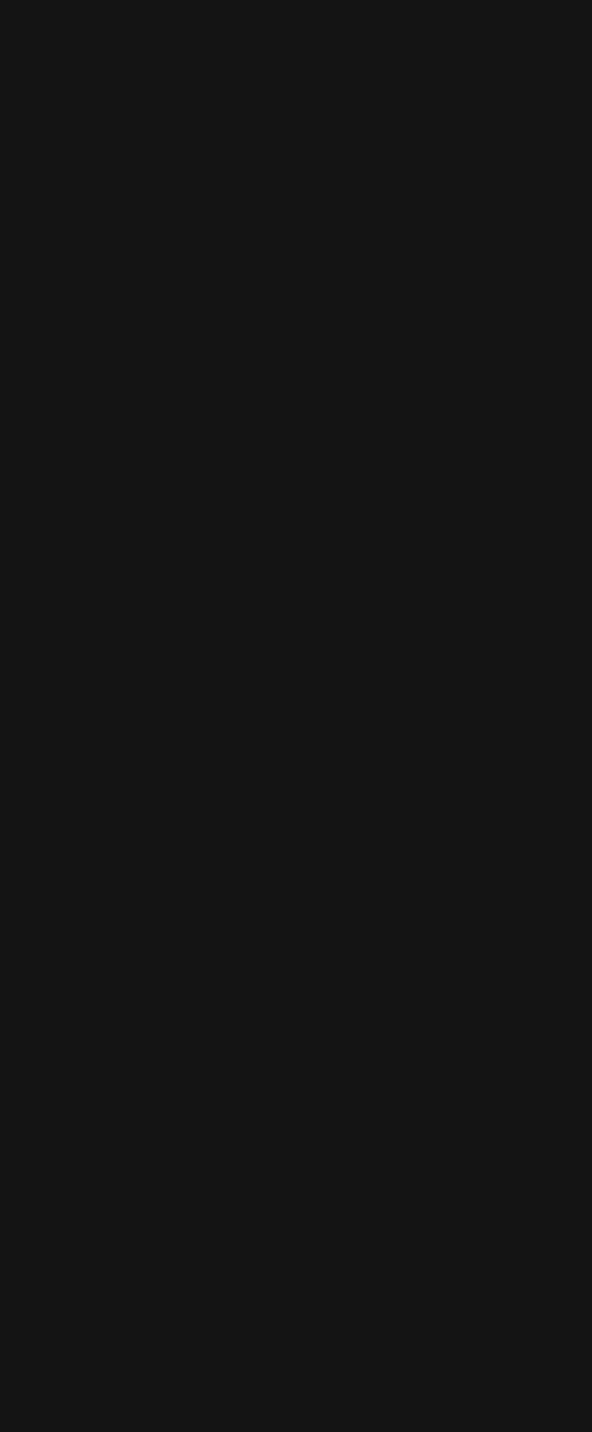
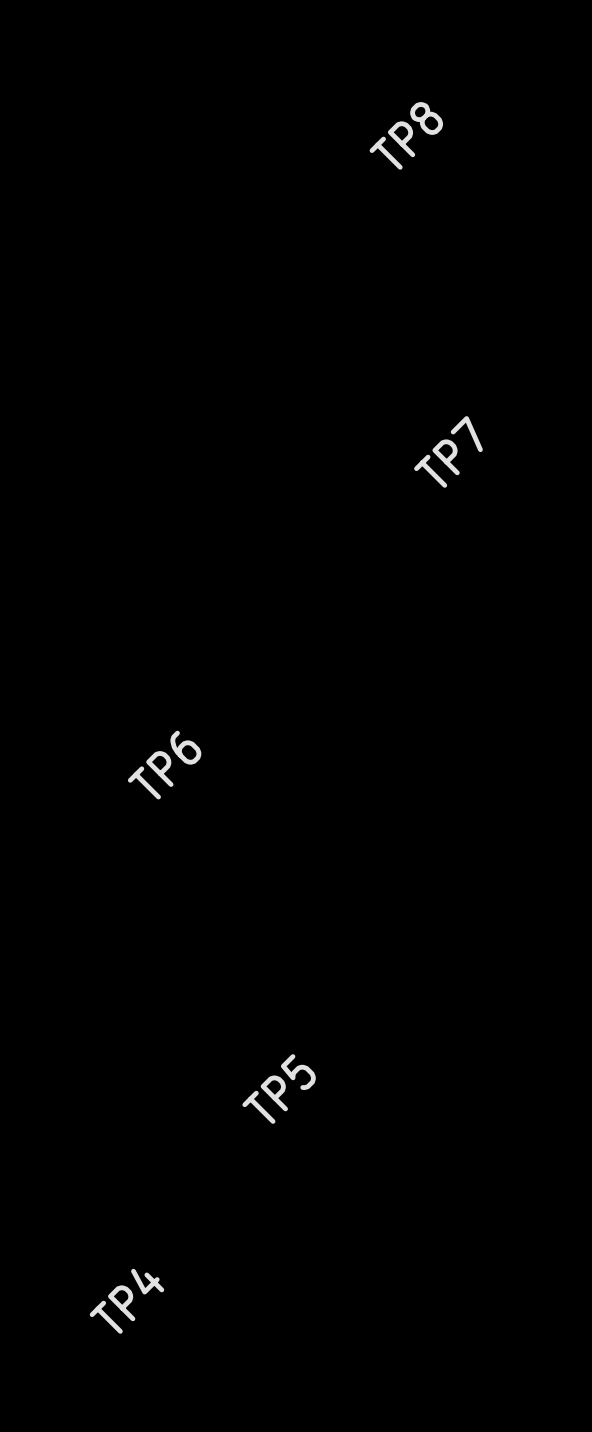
text: none -> TP8 (406, 135)
text: none -> TP7 (448, 451)
text: none -> TP6 (164, 765)
text: none -> TP5 (279, 1089)
text: none -> TP4 (126, 1301)

